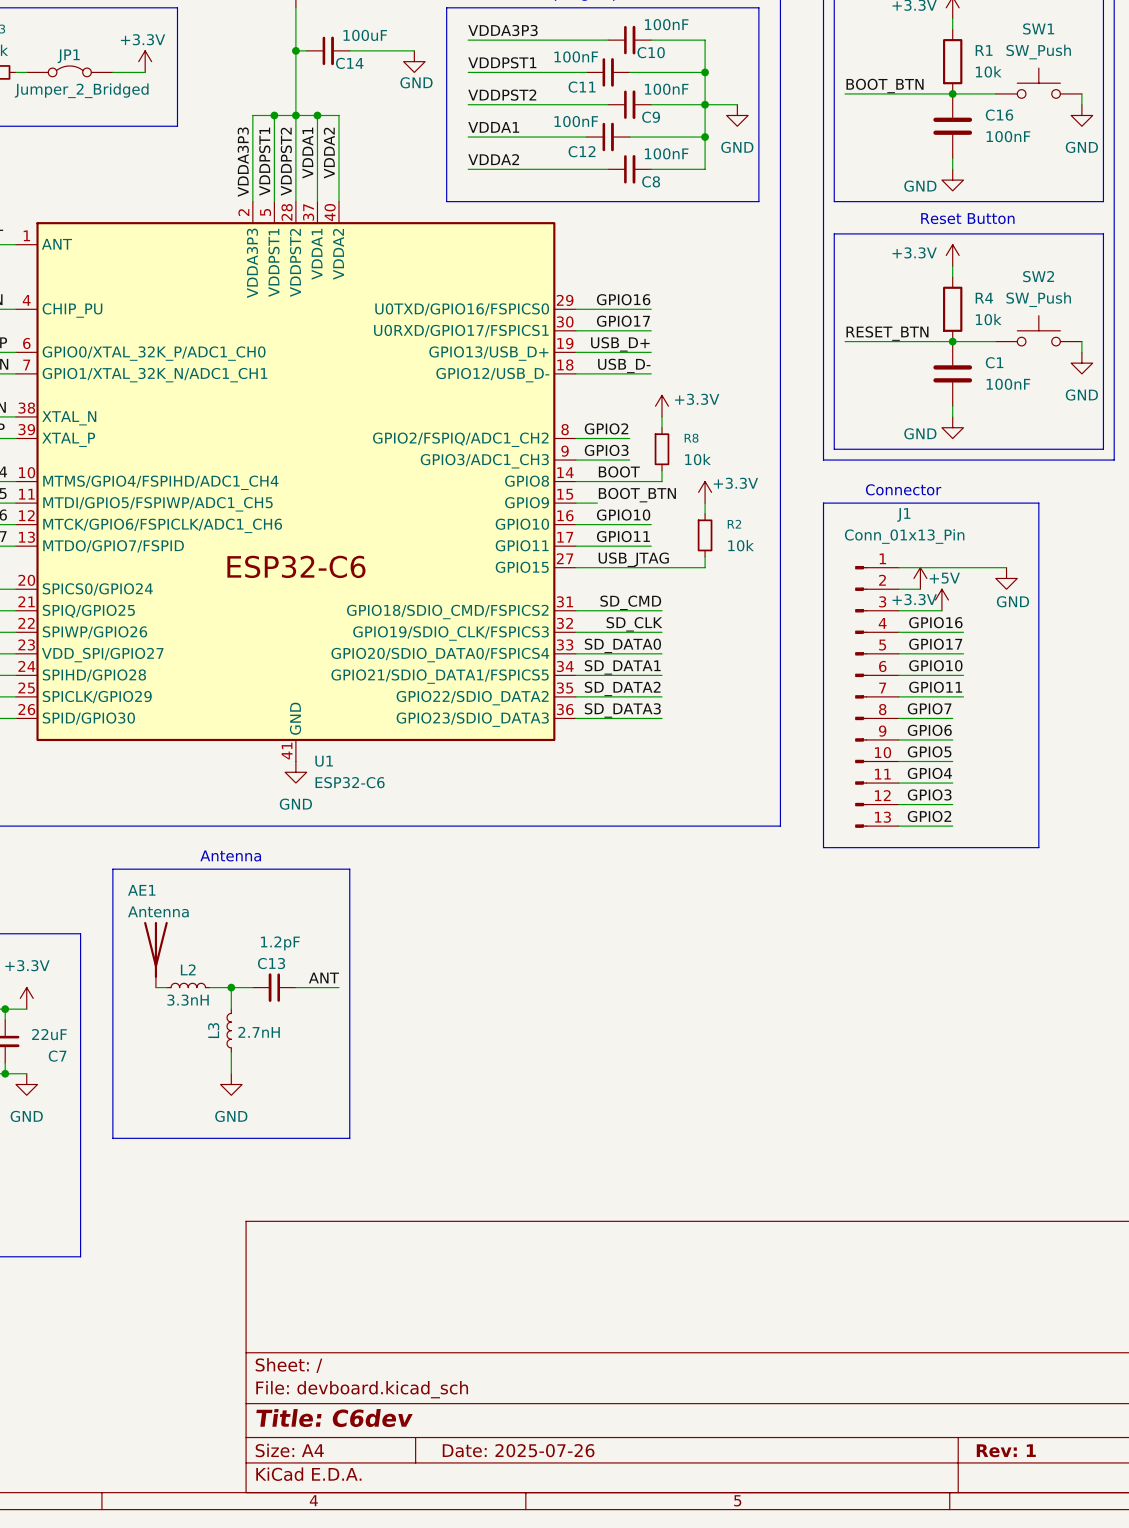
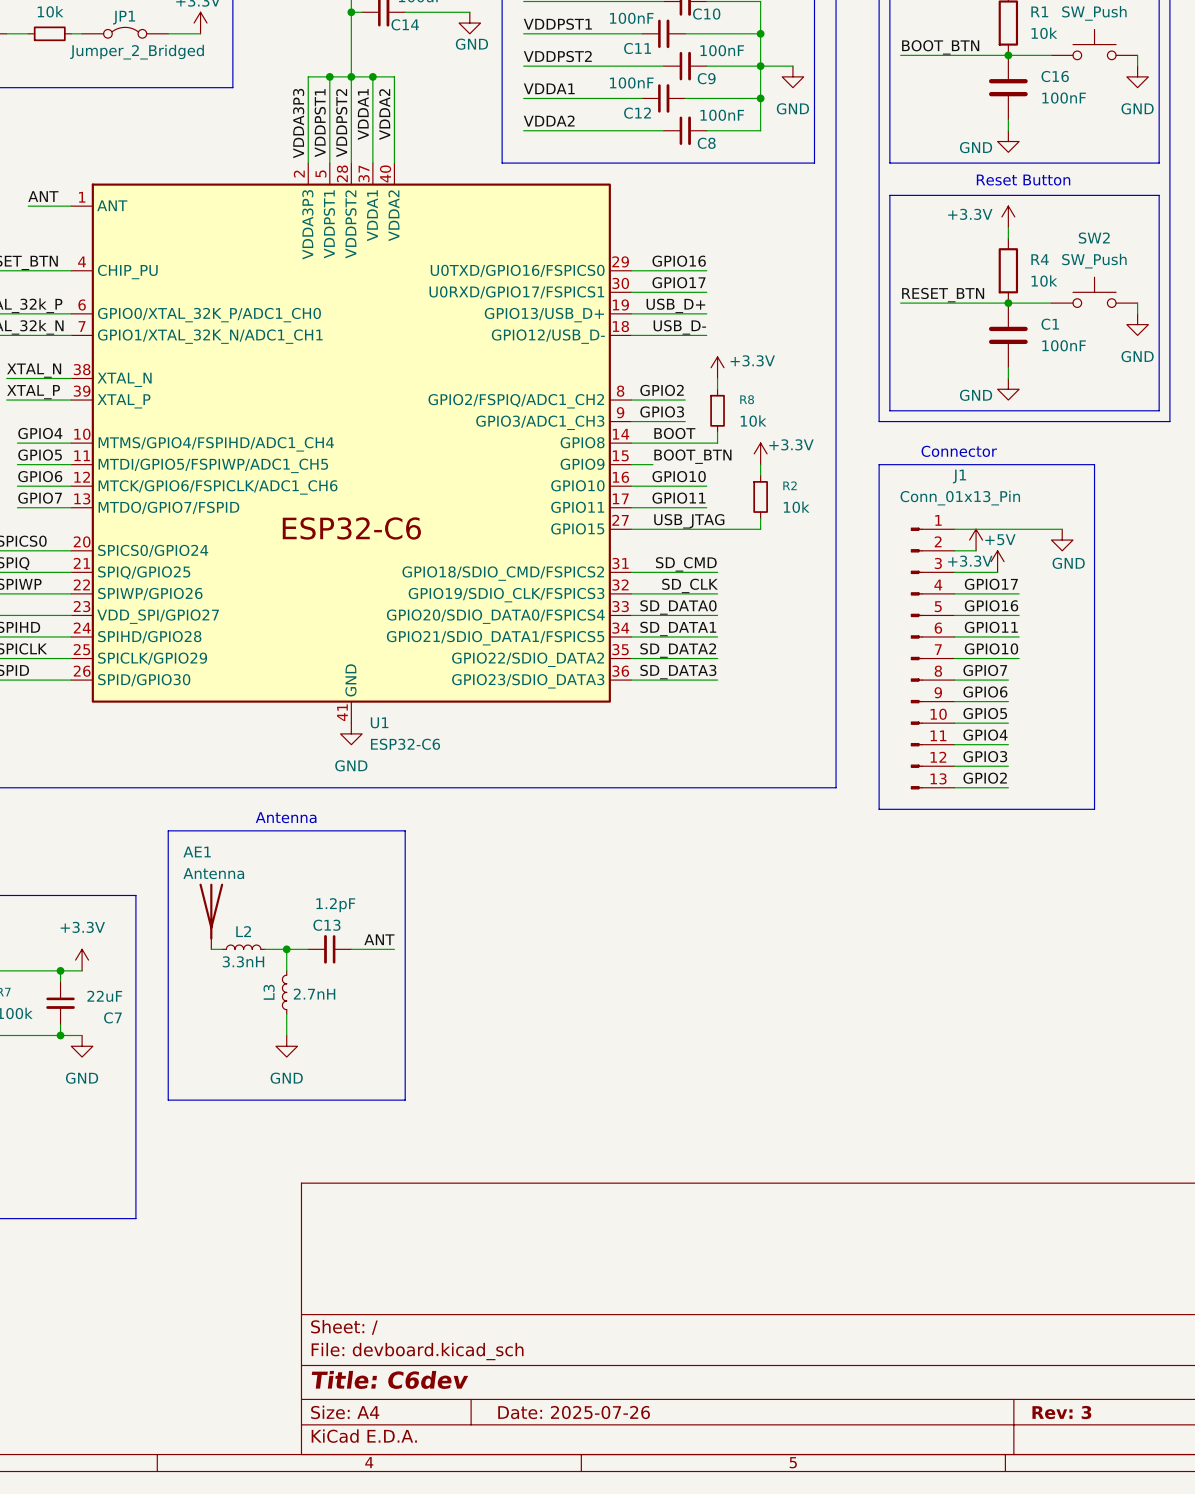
label: GPIO16 (935, 622) -> GPIO17 (991, 584)
label: GPIO17 (935, 644) -> GPIO16 (991, 605)
label: GPIO10 (935, 665) -> GPIO11 (991, 627)
label: GPIO11 (935, 687) -> GPIO10 (991, 648)
title block: Rev: 1 (1006, 1450) -> Rev: 3 (1061, 1412)

